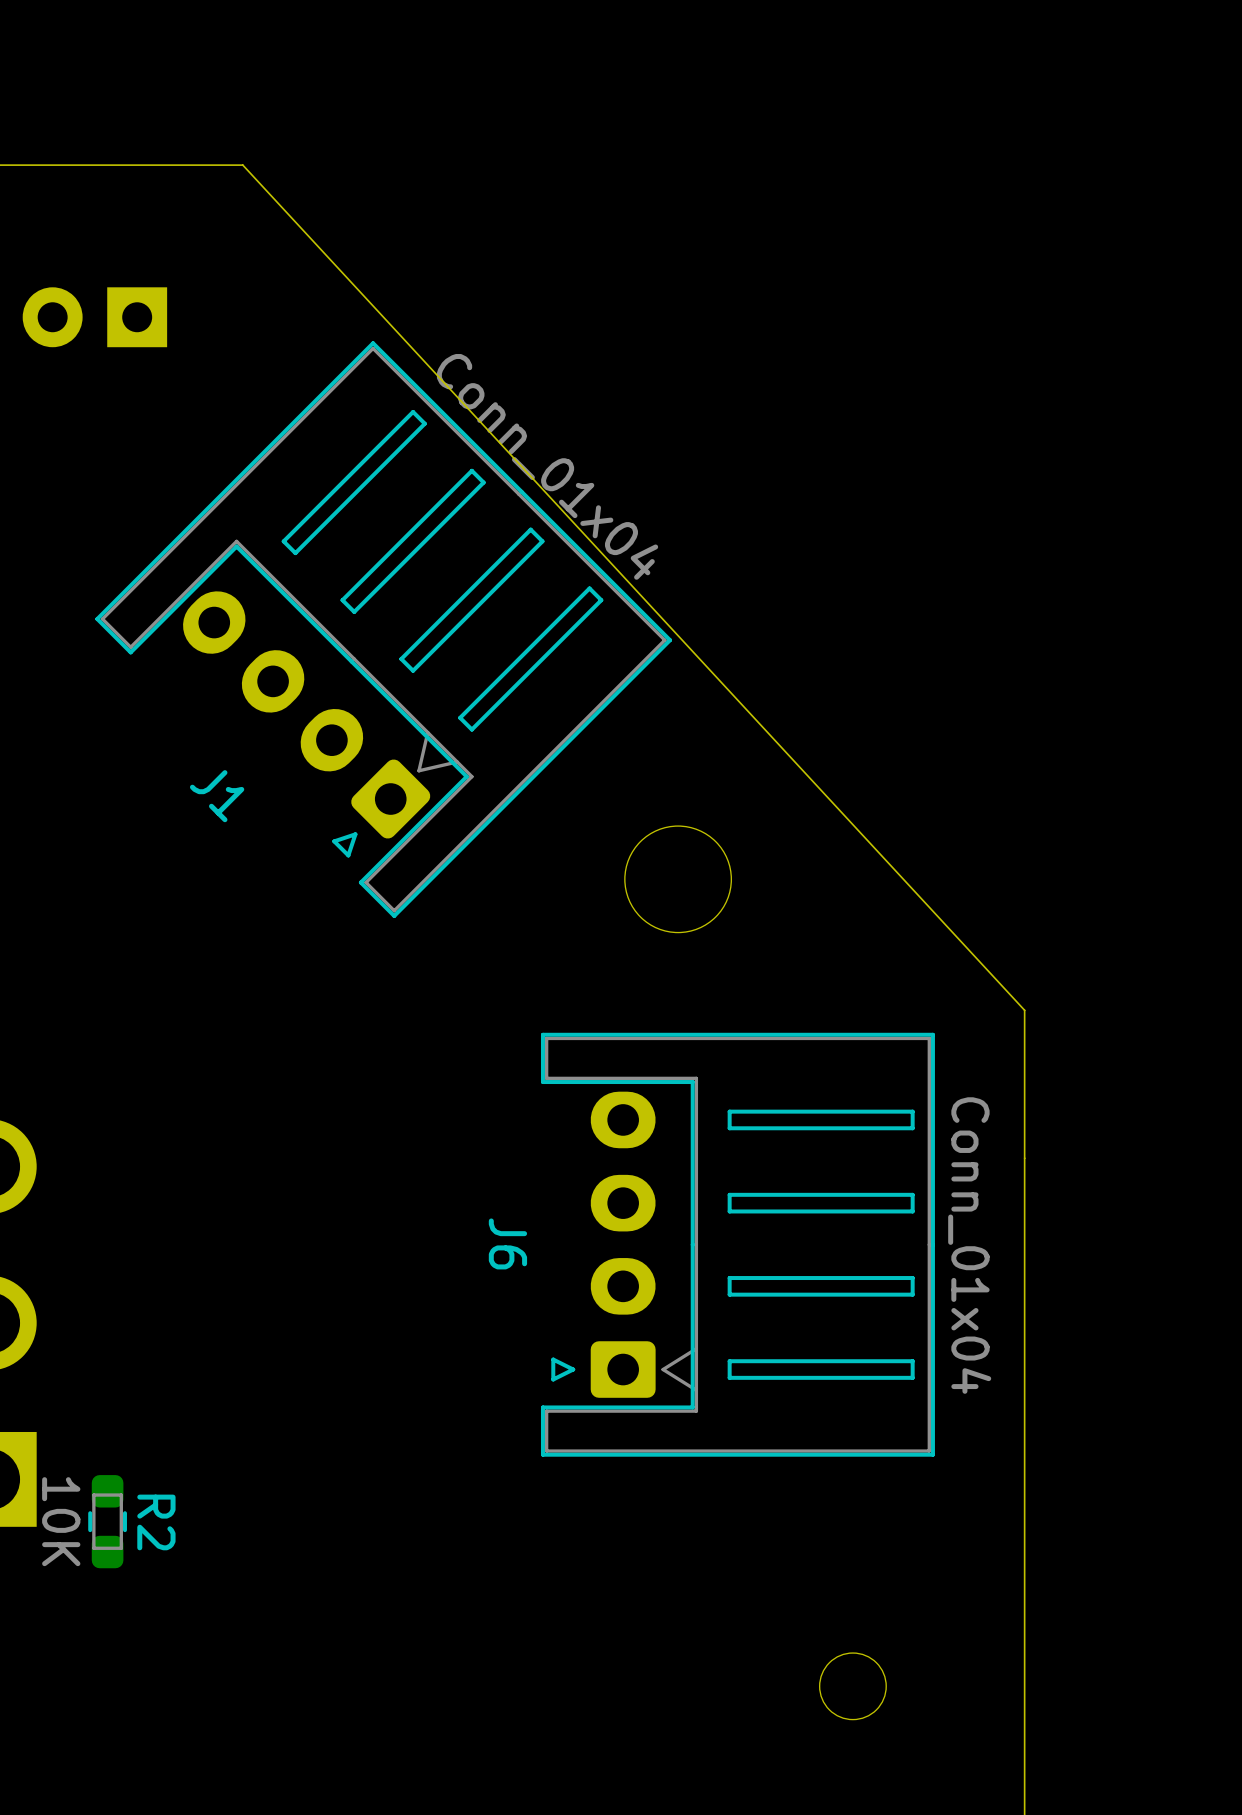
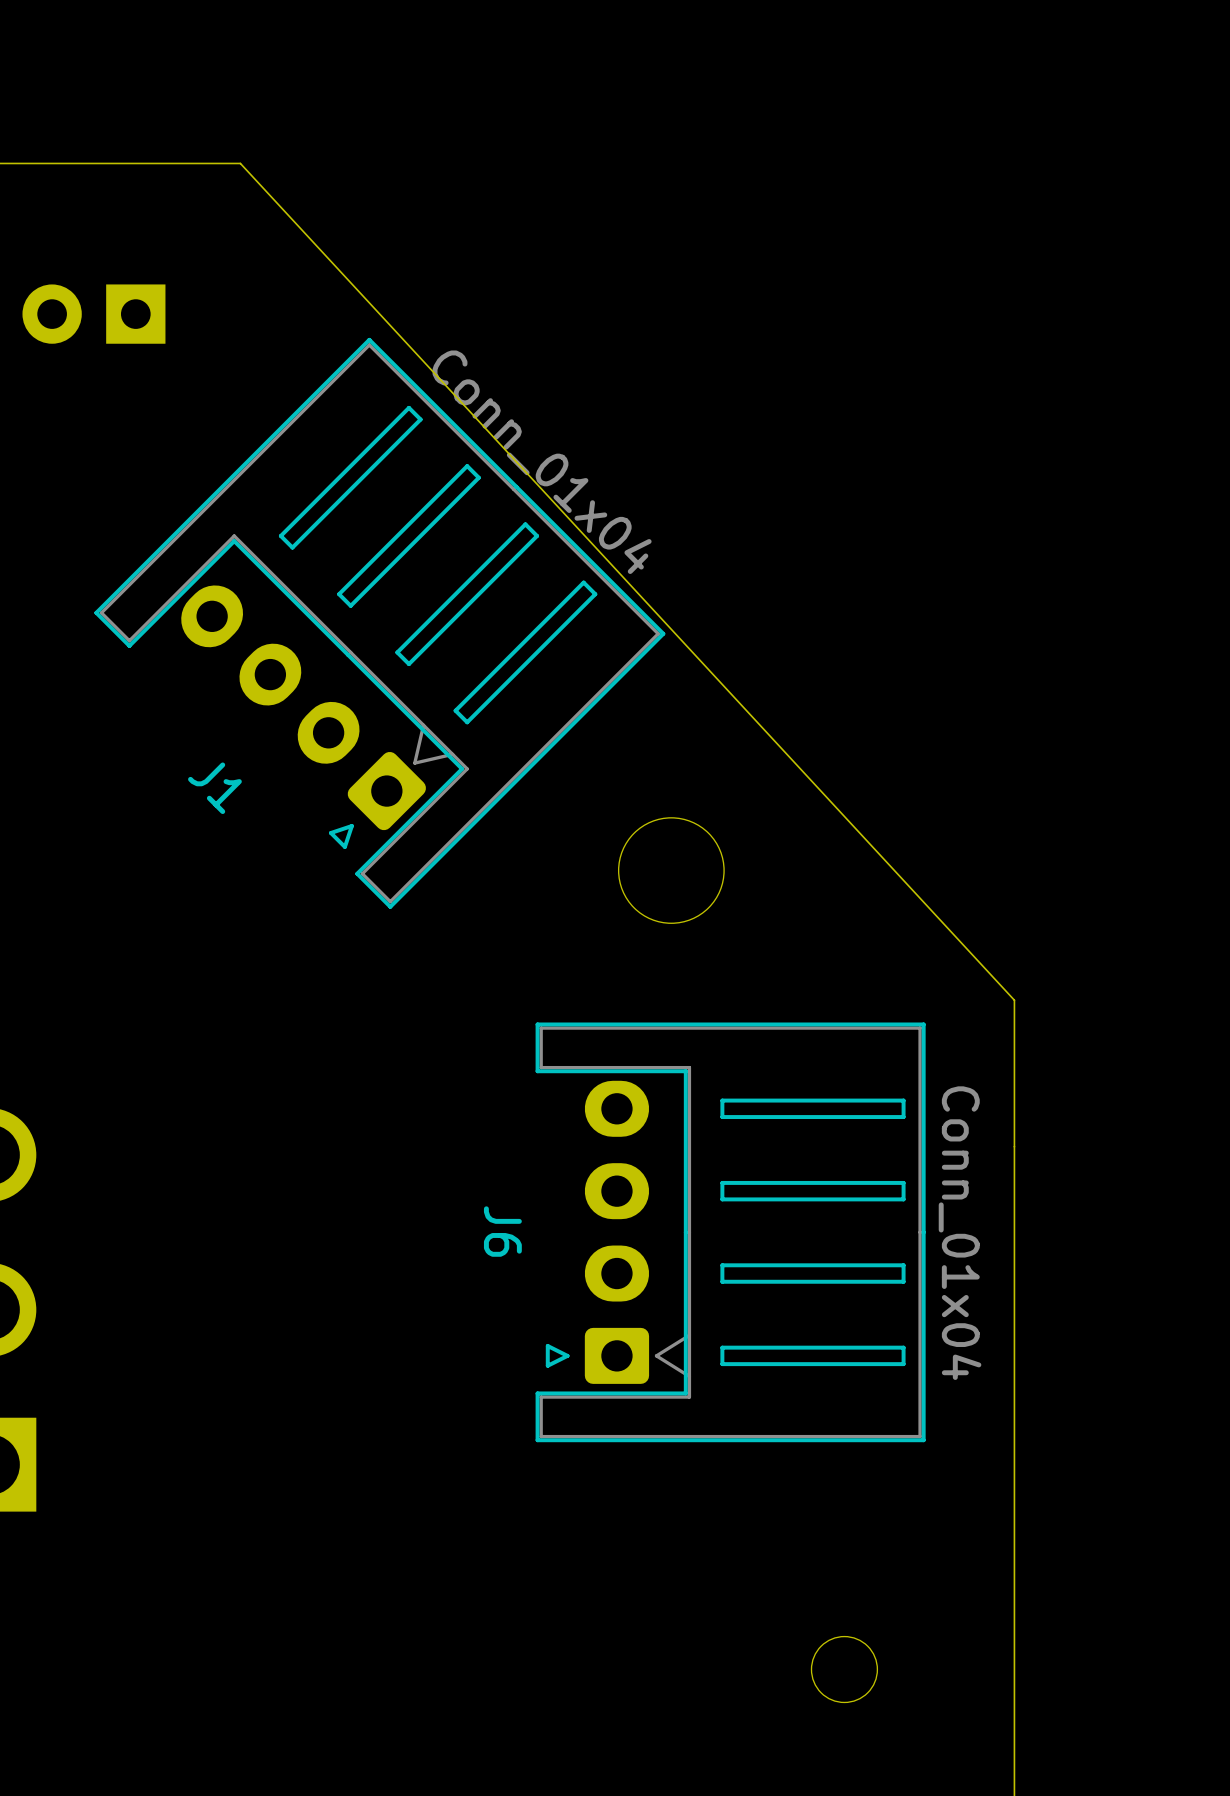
R2: 10K (107, 1521) -> none

